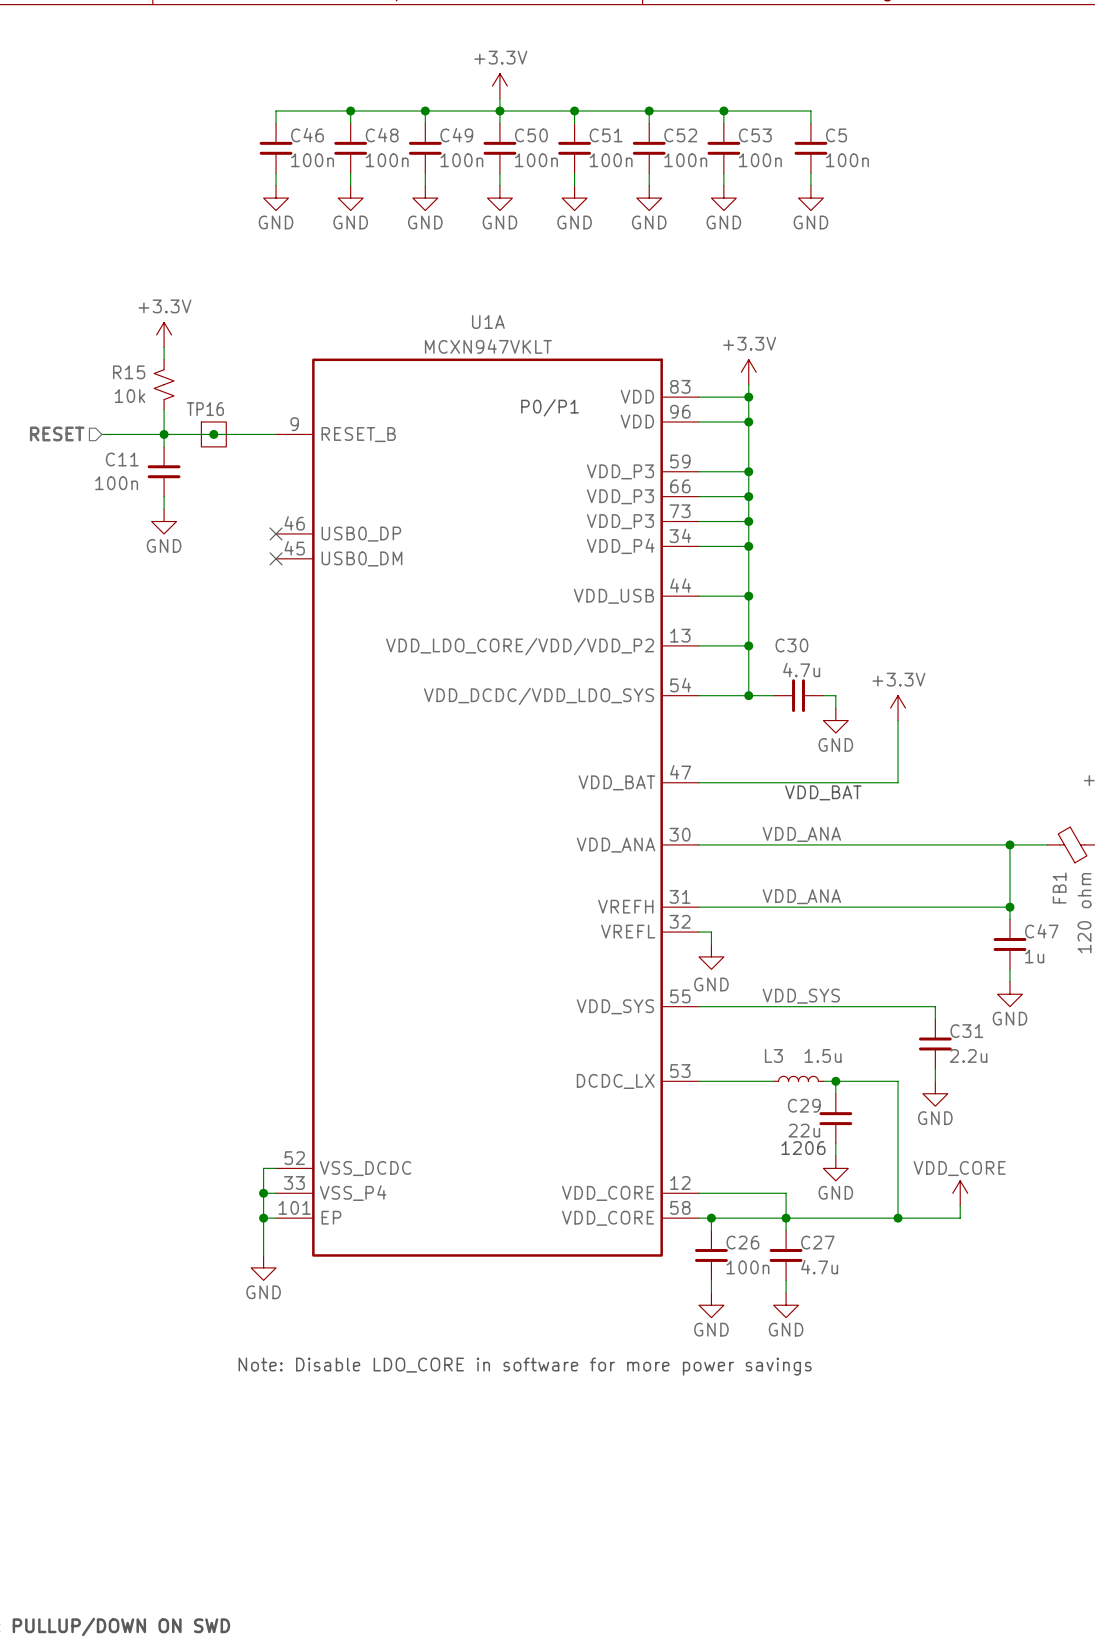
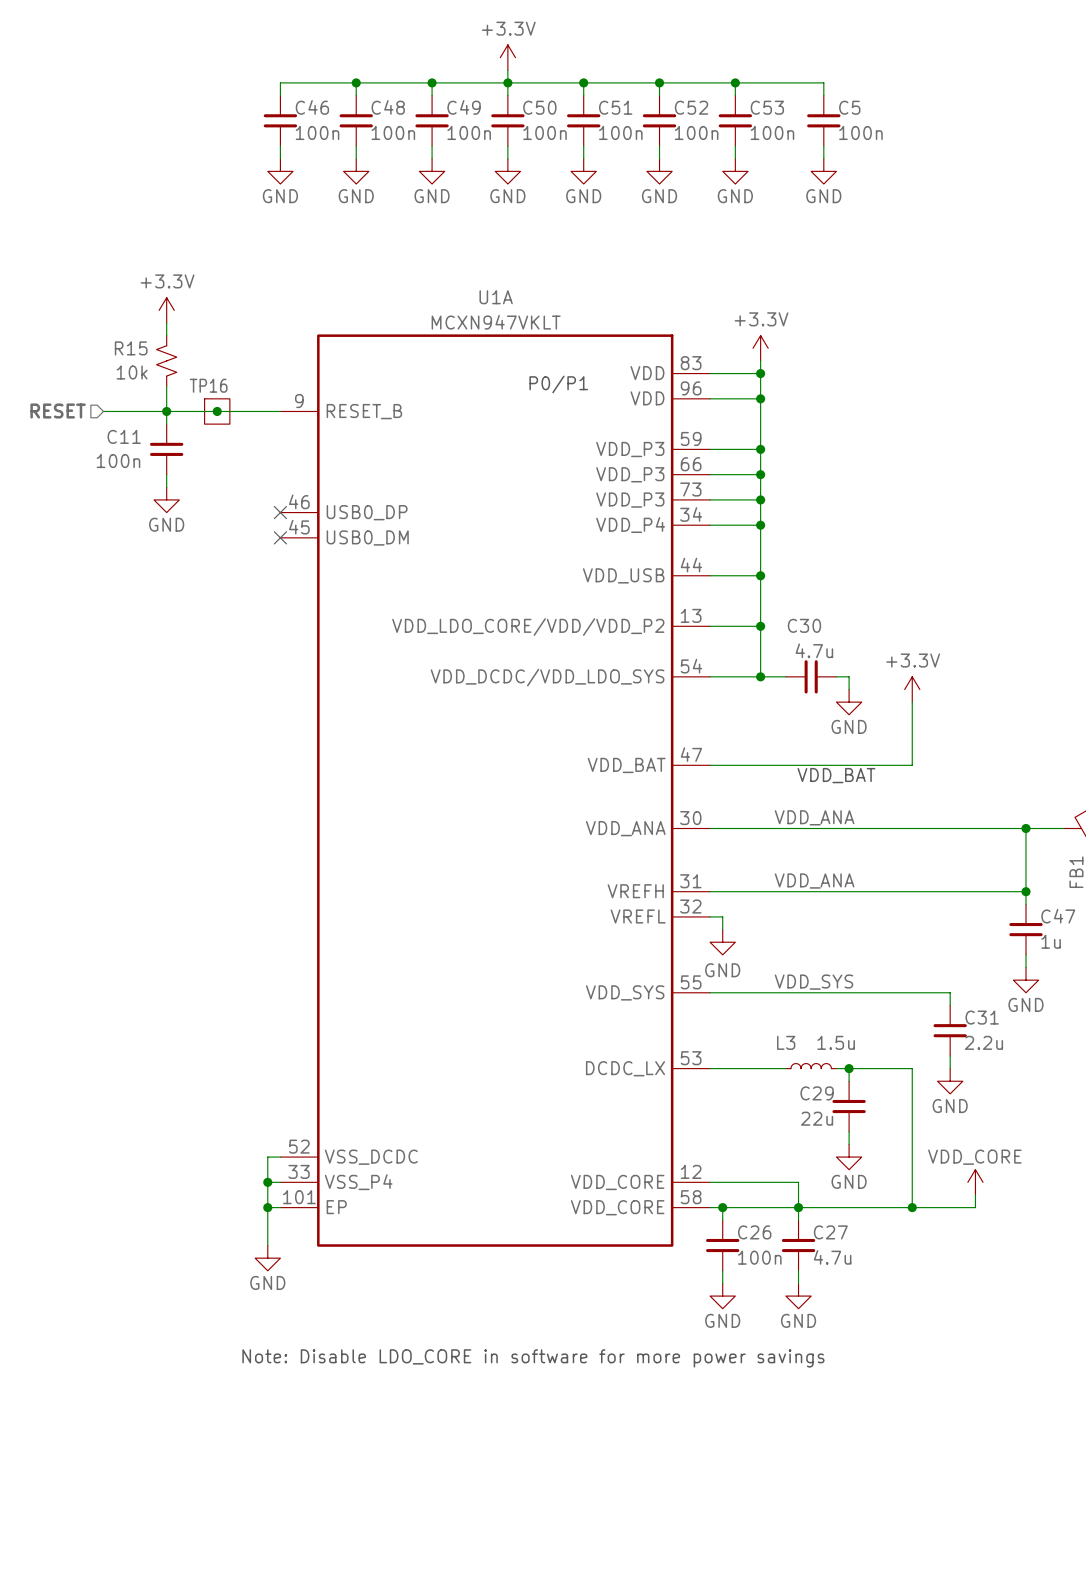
text: 1206 (803, 1148) -> none

